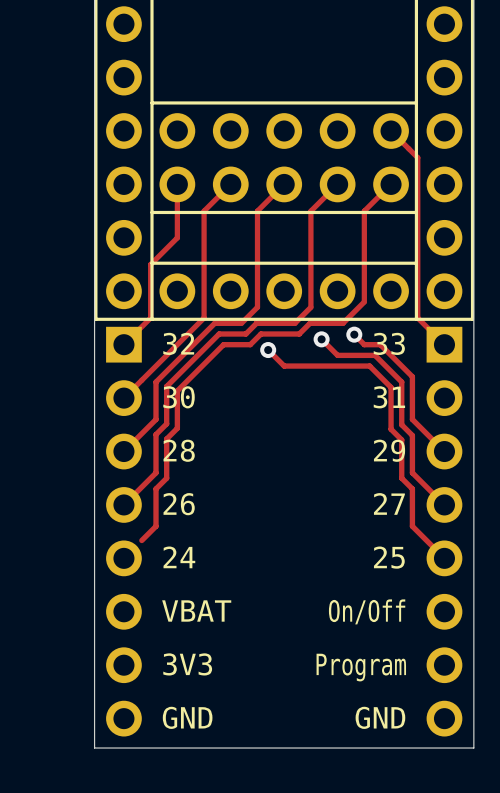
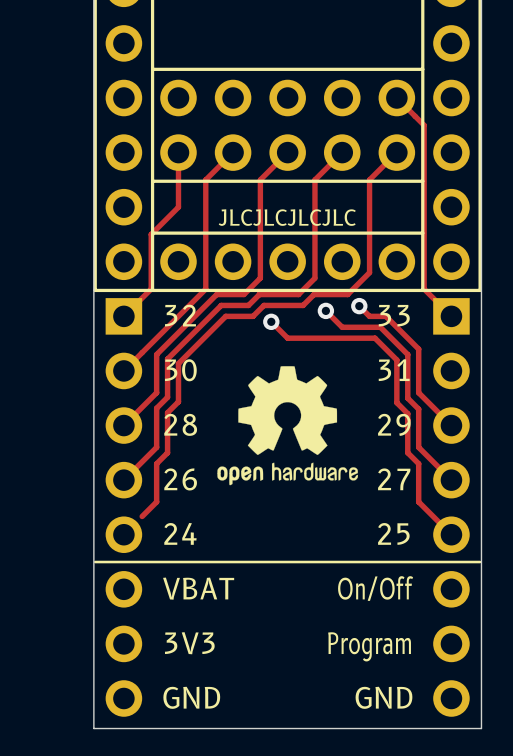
text: none -> JLCJLCJLCJLC (287, 217)
drawing: none -> [217, 366, 358, 486]
line: none -> (95, 562) (480, 562)

